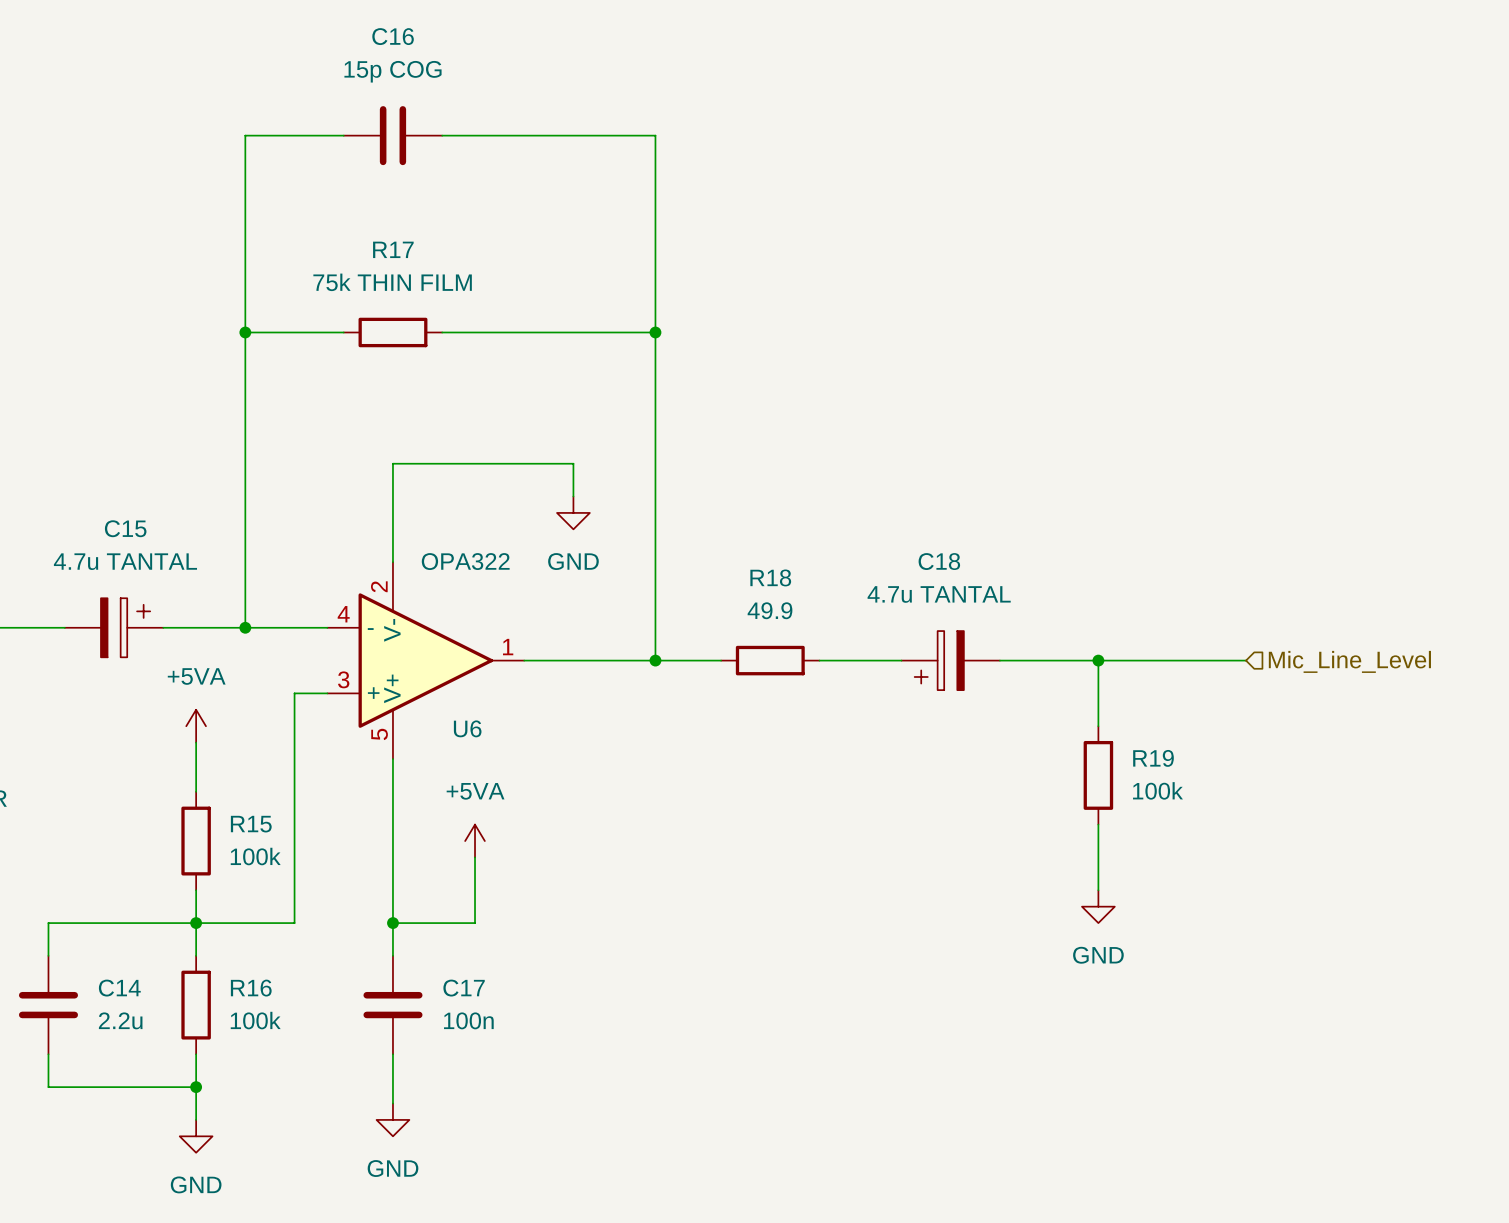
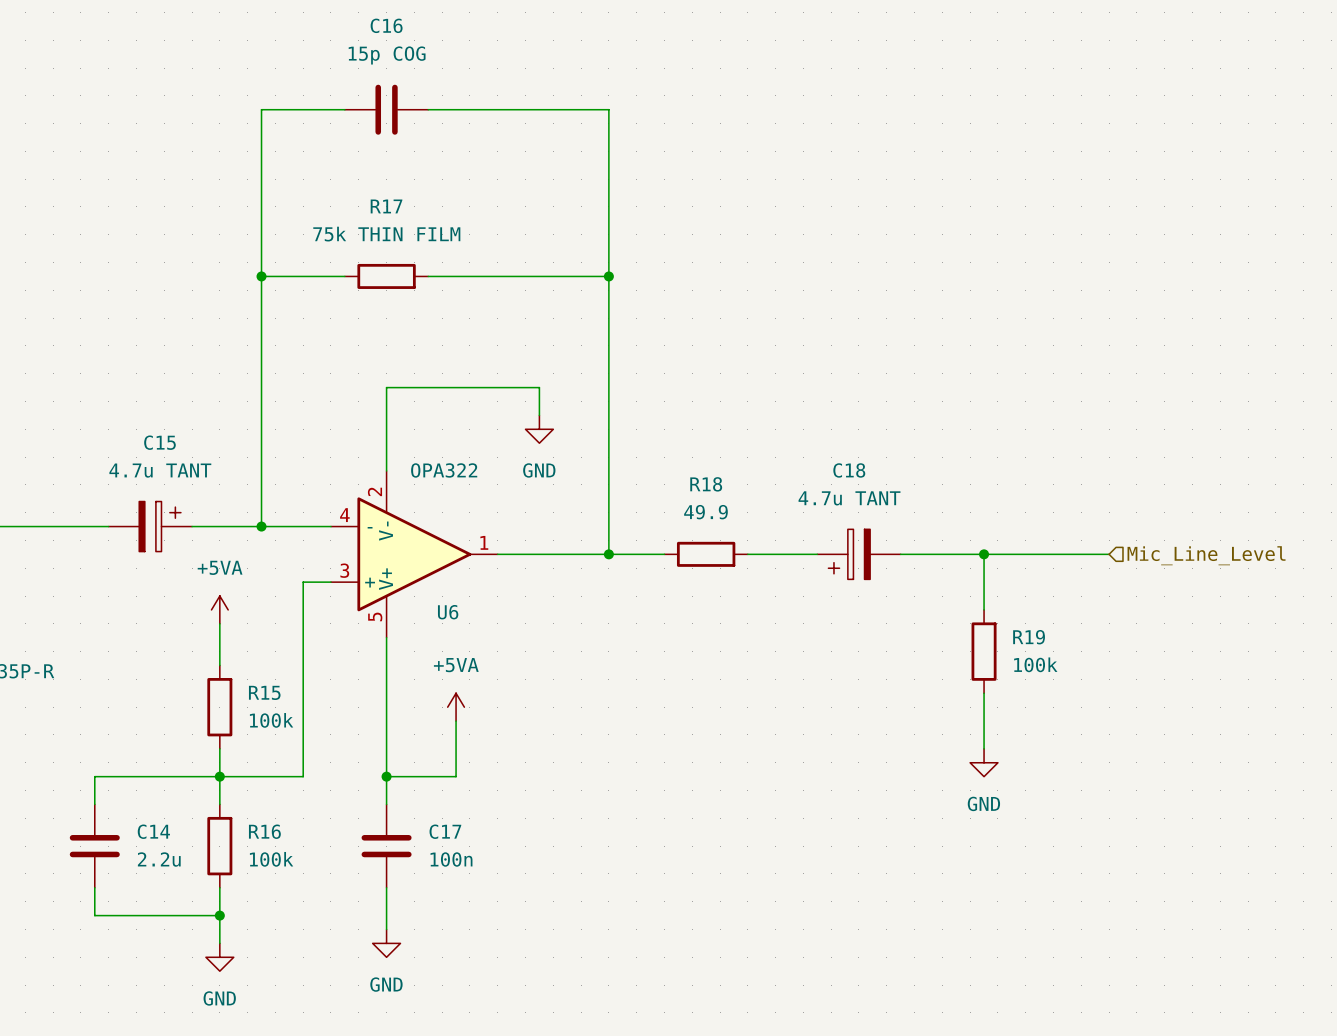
C15 value: 4.7u TANTAL (125, 561) -> 4.7u TANT (160, 470)
C18 value: 4.7u TANTAL (939, 594) -> 4.7u TANT (849, 498)

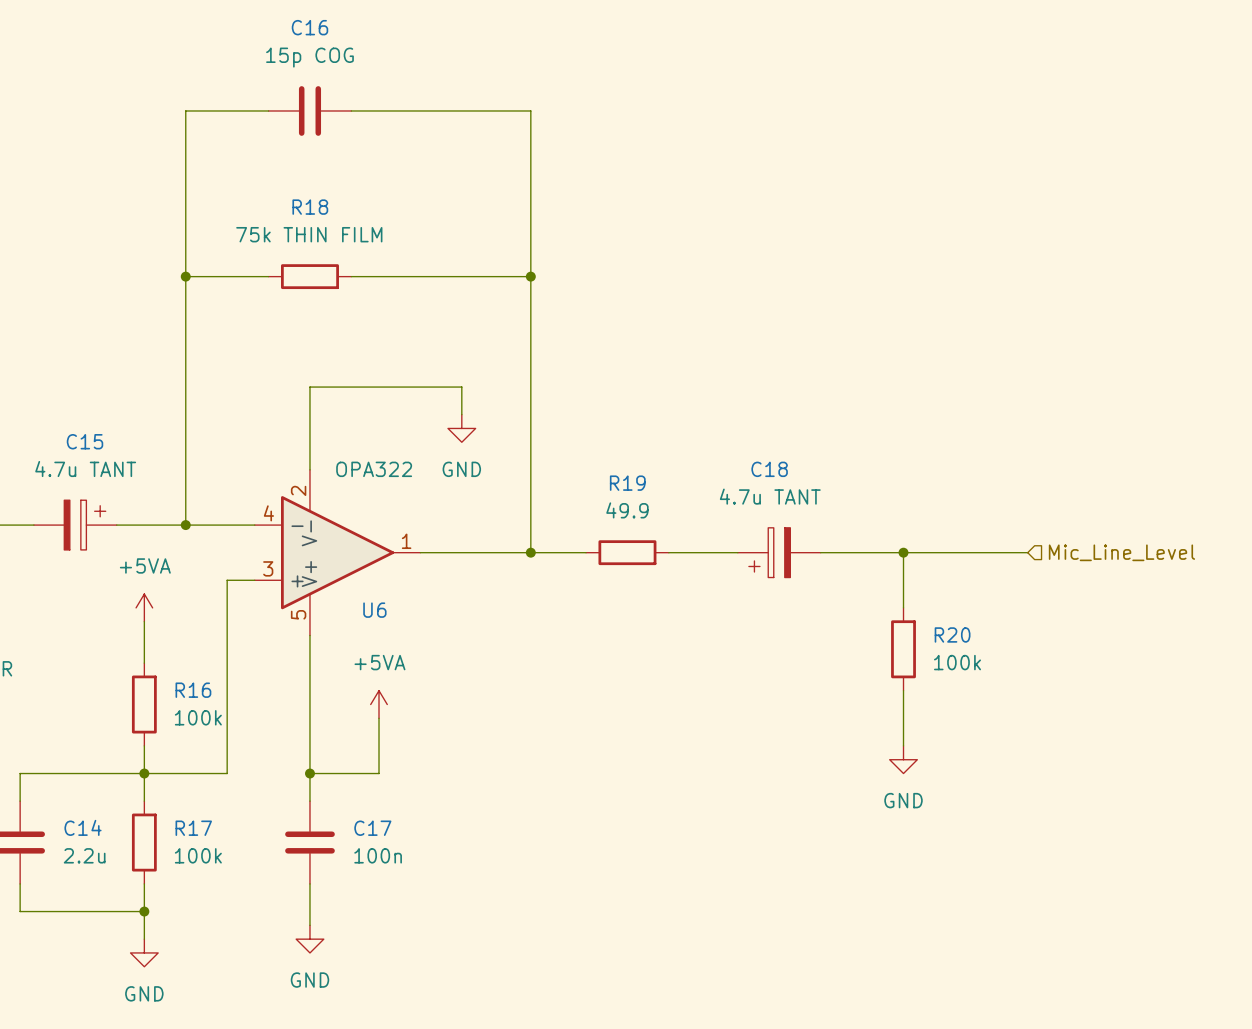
R17 name: R17 (386, 206) -> R18 (310, 207)
R18 name: R18 (706, 484) -> R19 (627, 483)
R19 name: R19 (1029, 637) -> R20 (952, 634)
R15 name: R15 (264, 692) -> R16 (193, 690)
R16 name: R16 (264, 831) -> R17 (193, 828)

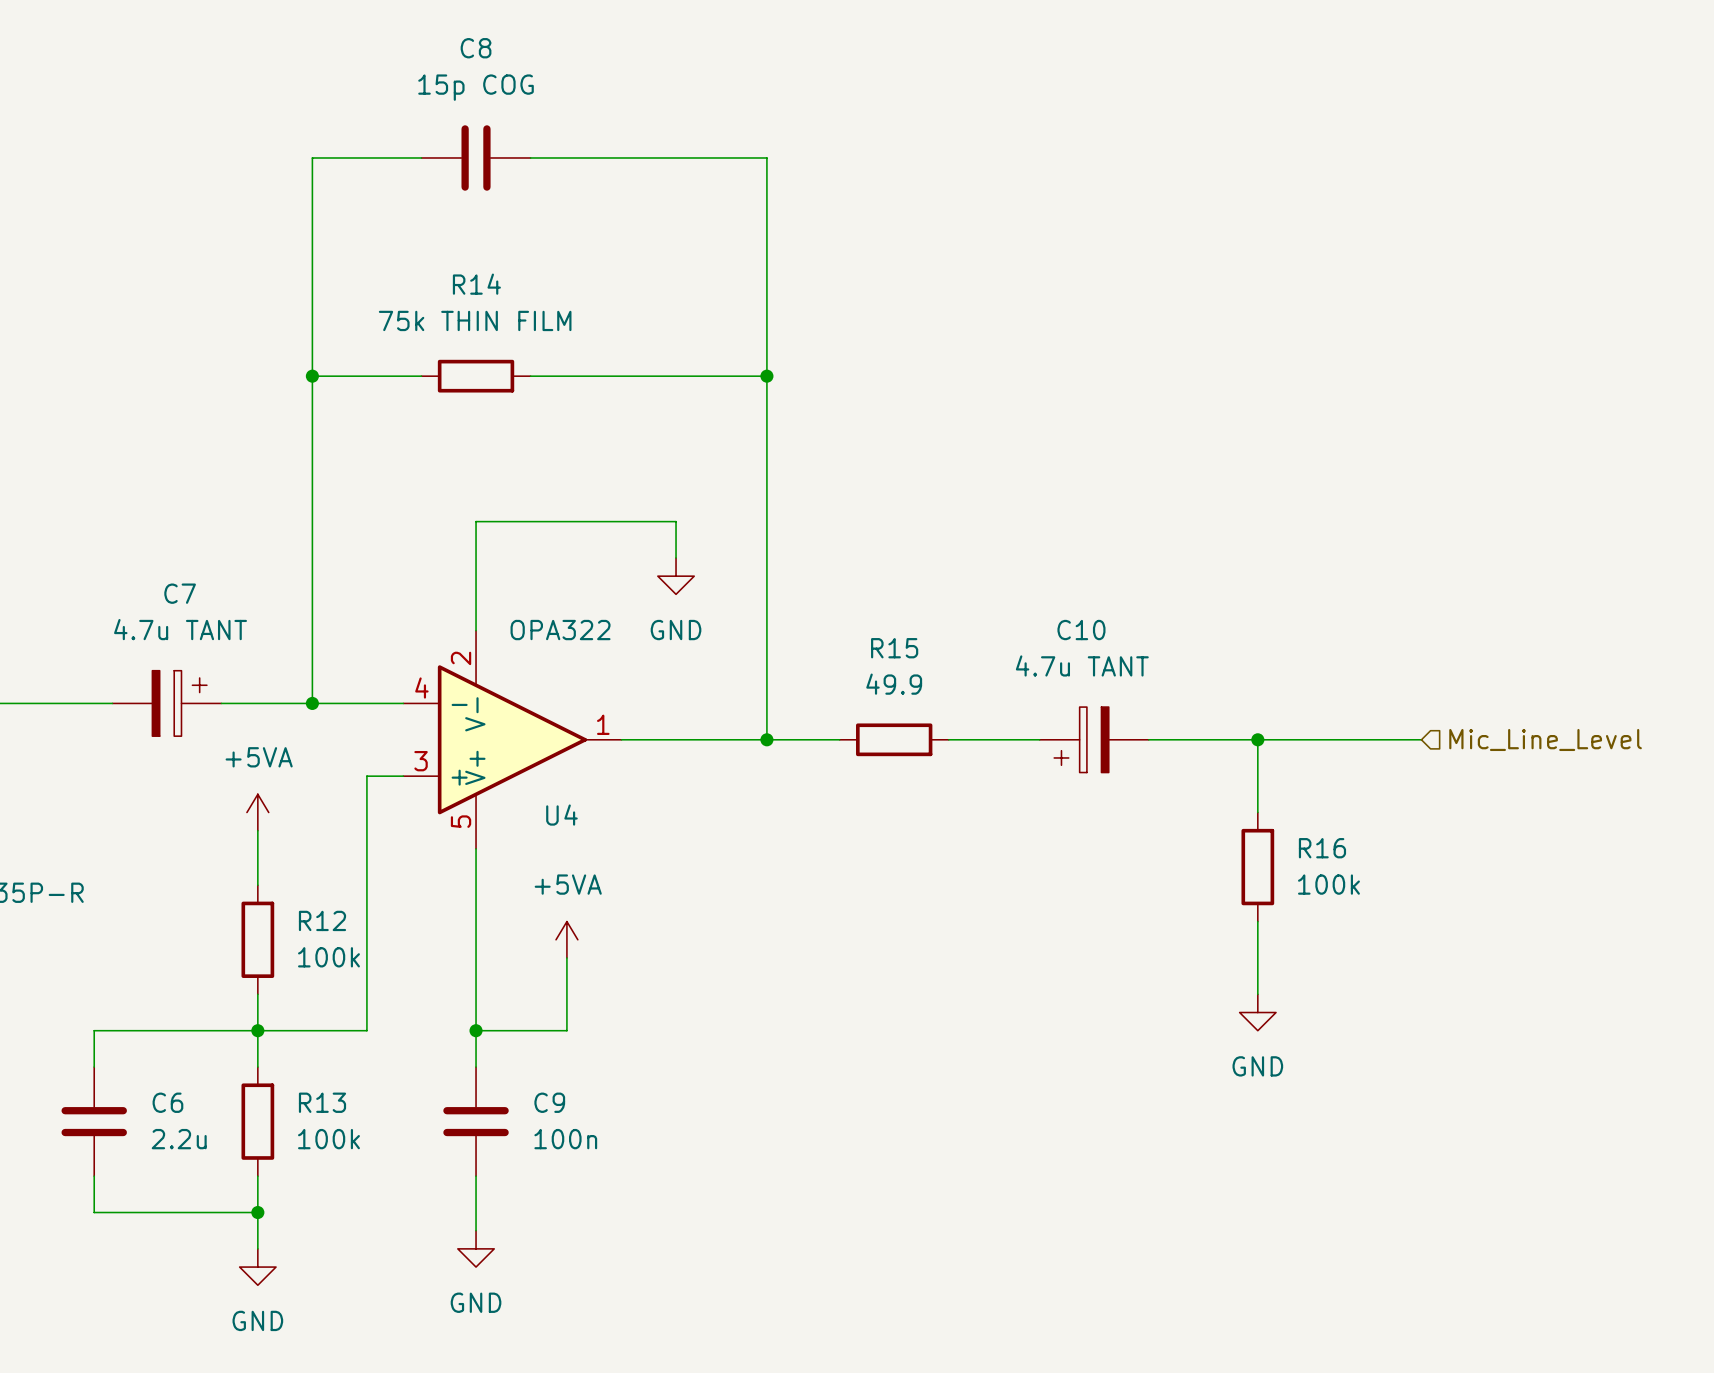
C16 name: C16 (309, 27) -> C8 (476, 48)
R18 name: R18 (310, 207) -> R14 (476, 284)
C15 name: C15 (85, 441) -> C7 (180, 593)
C18 name: C18 (769, 469) -> C10 (1081, 630)
R19 name: R19 (627, 483) -> R15 (894, 648)
U6 name: U6 (374, 610) -> U4 (561, 815)
R20 name: R20 (952, 634) -> R16 (1322, 848)
R16 name: R16 (193, 690) -> R12 (322, 920)
C14 name: C14 (83, 827) -> C6 (167, 1102)
R17 name: R17 (193, 828) -> R13 (322, 1102)
C17 name: C17 (372, 828) -> C9 (549, 1102)

